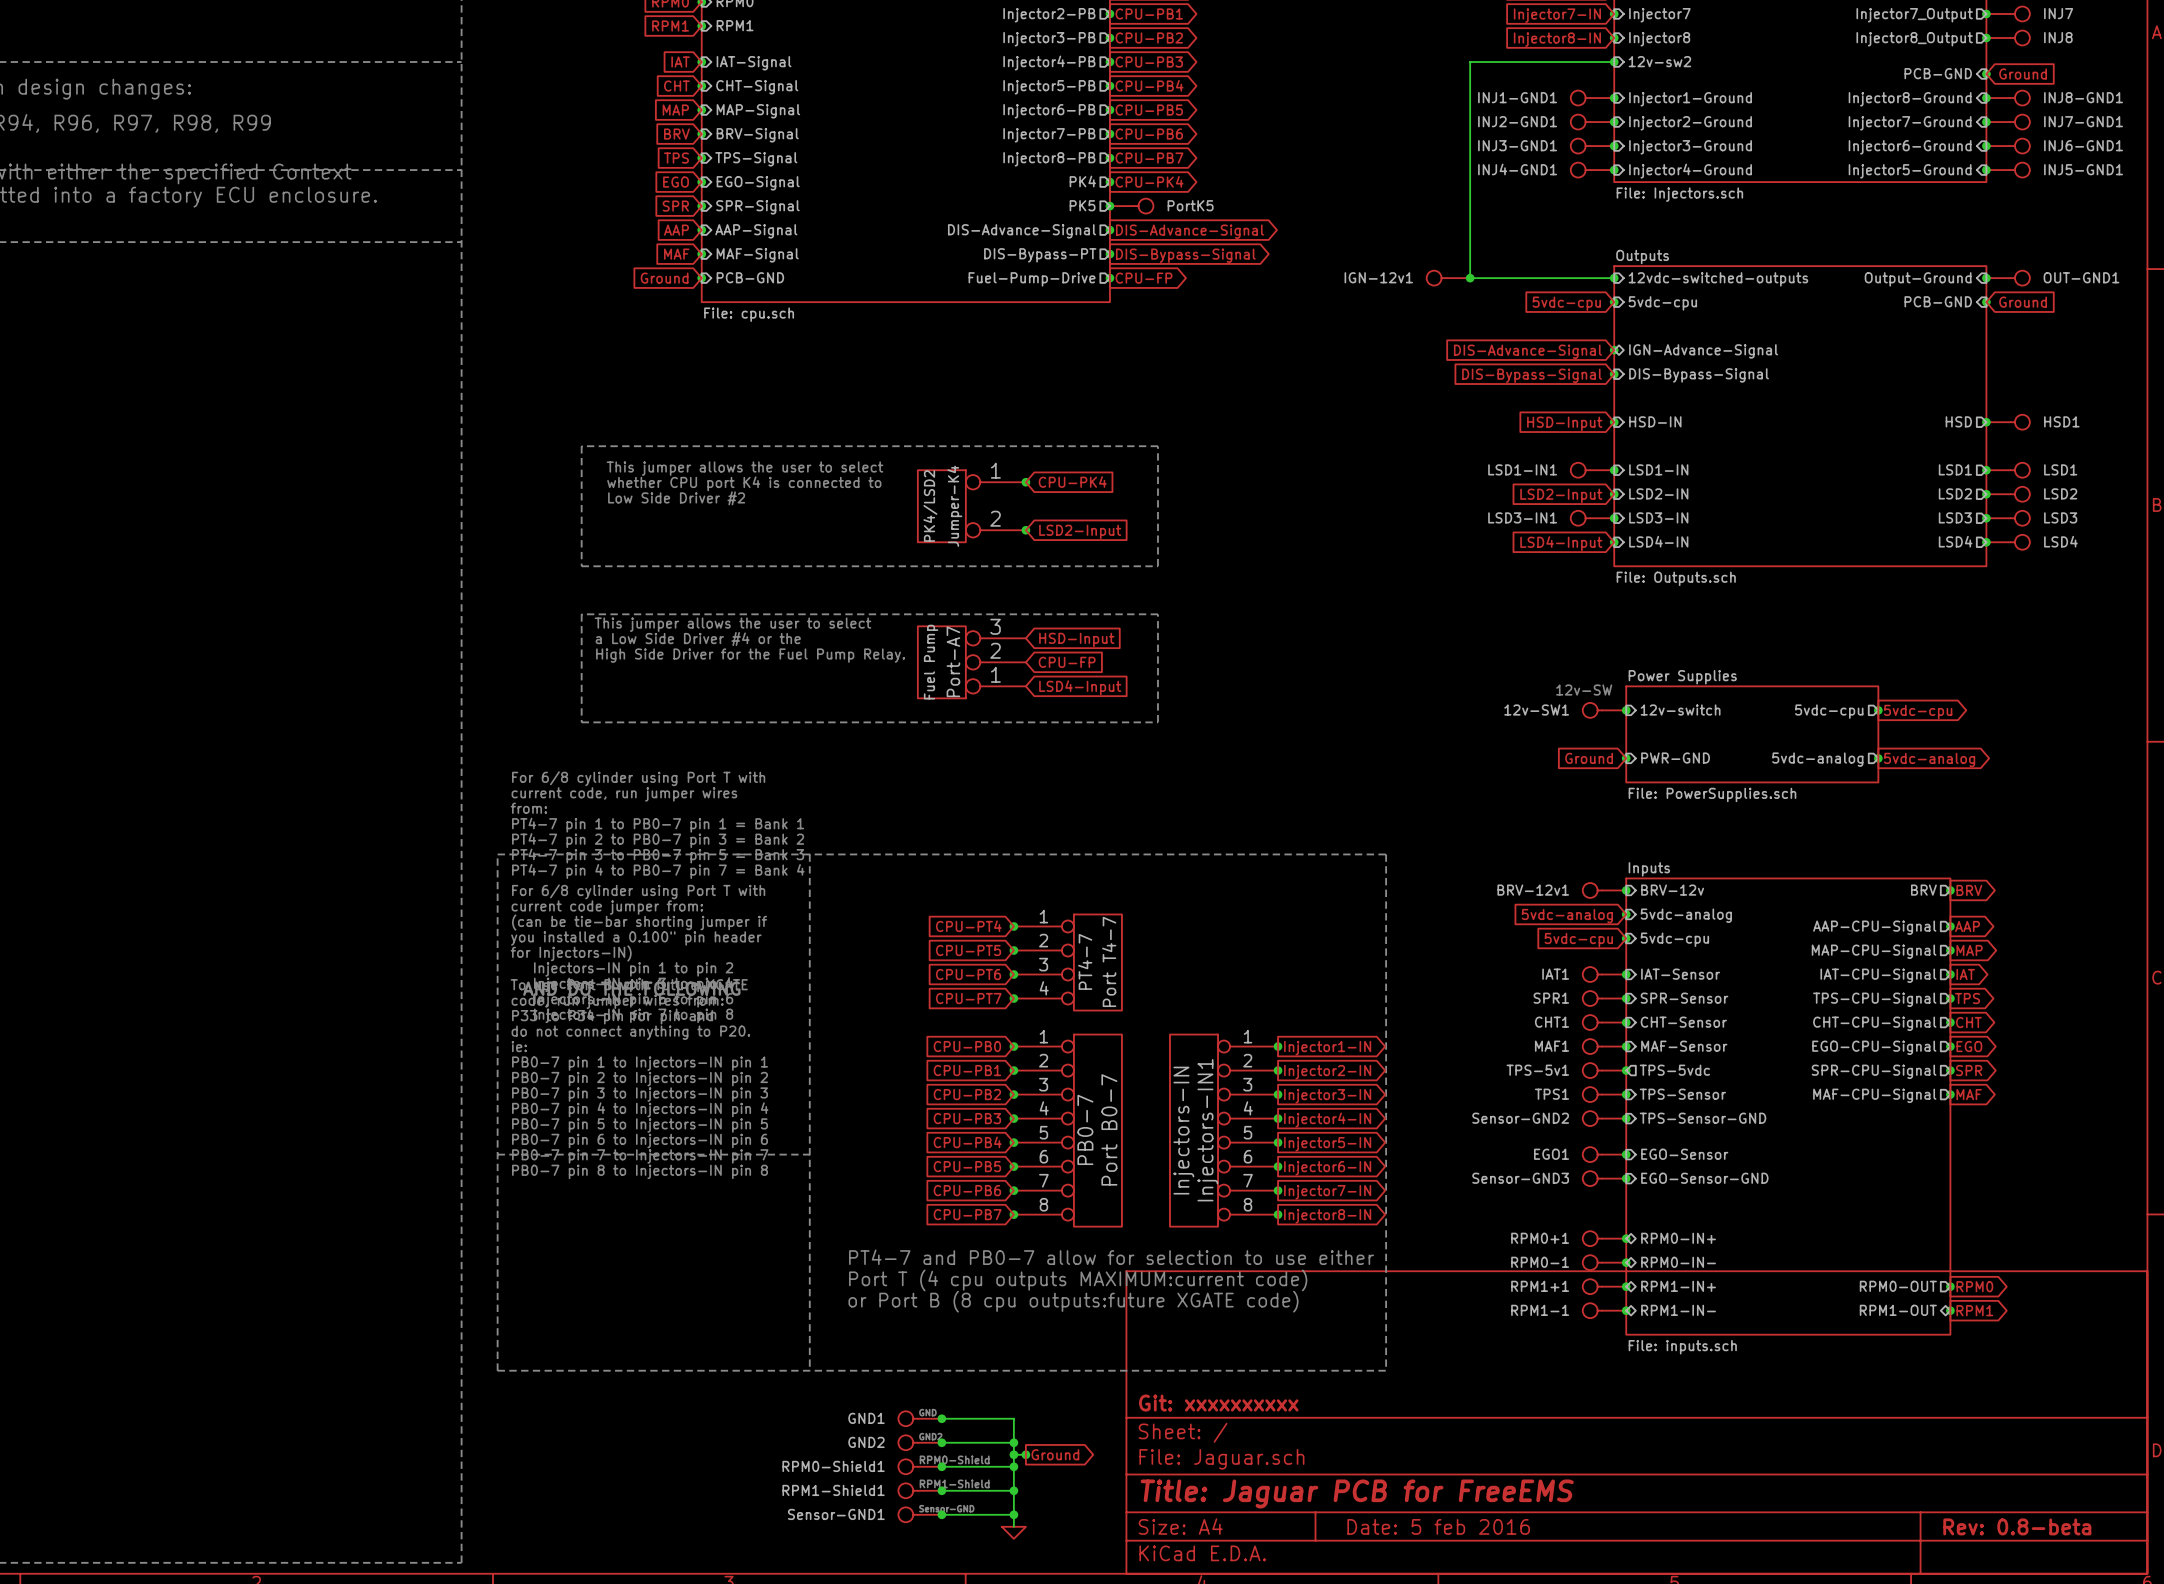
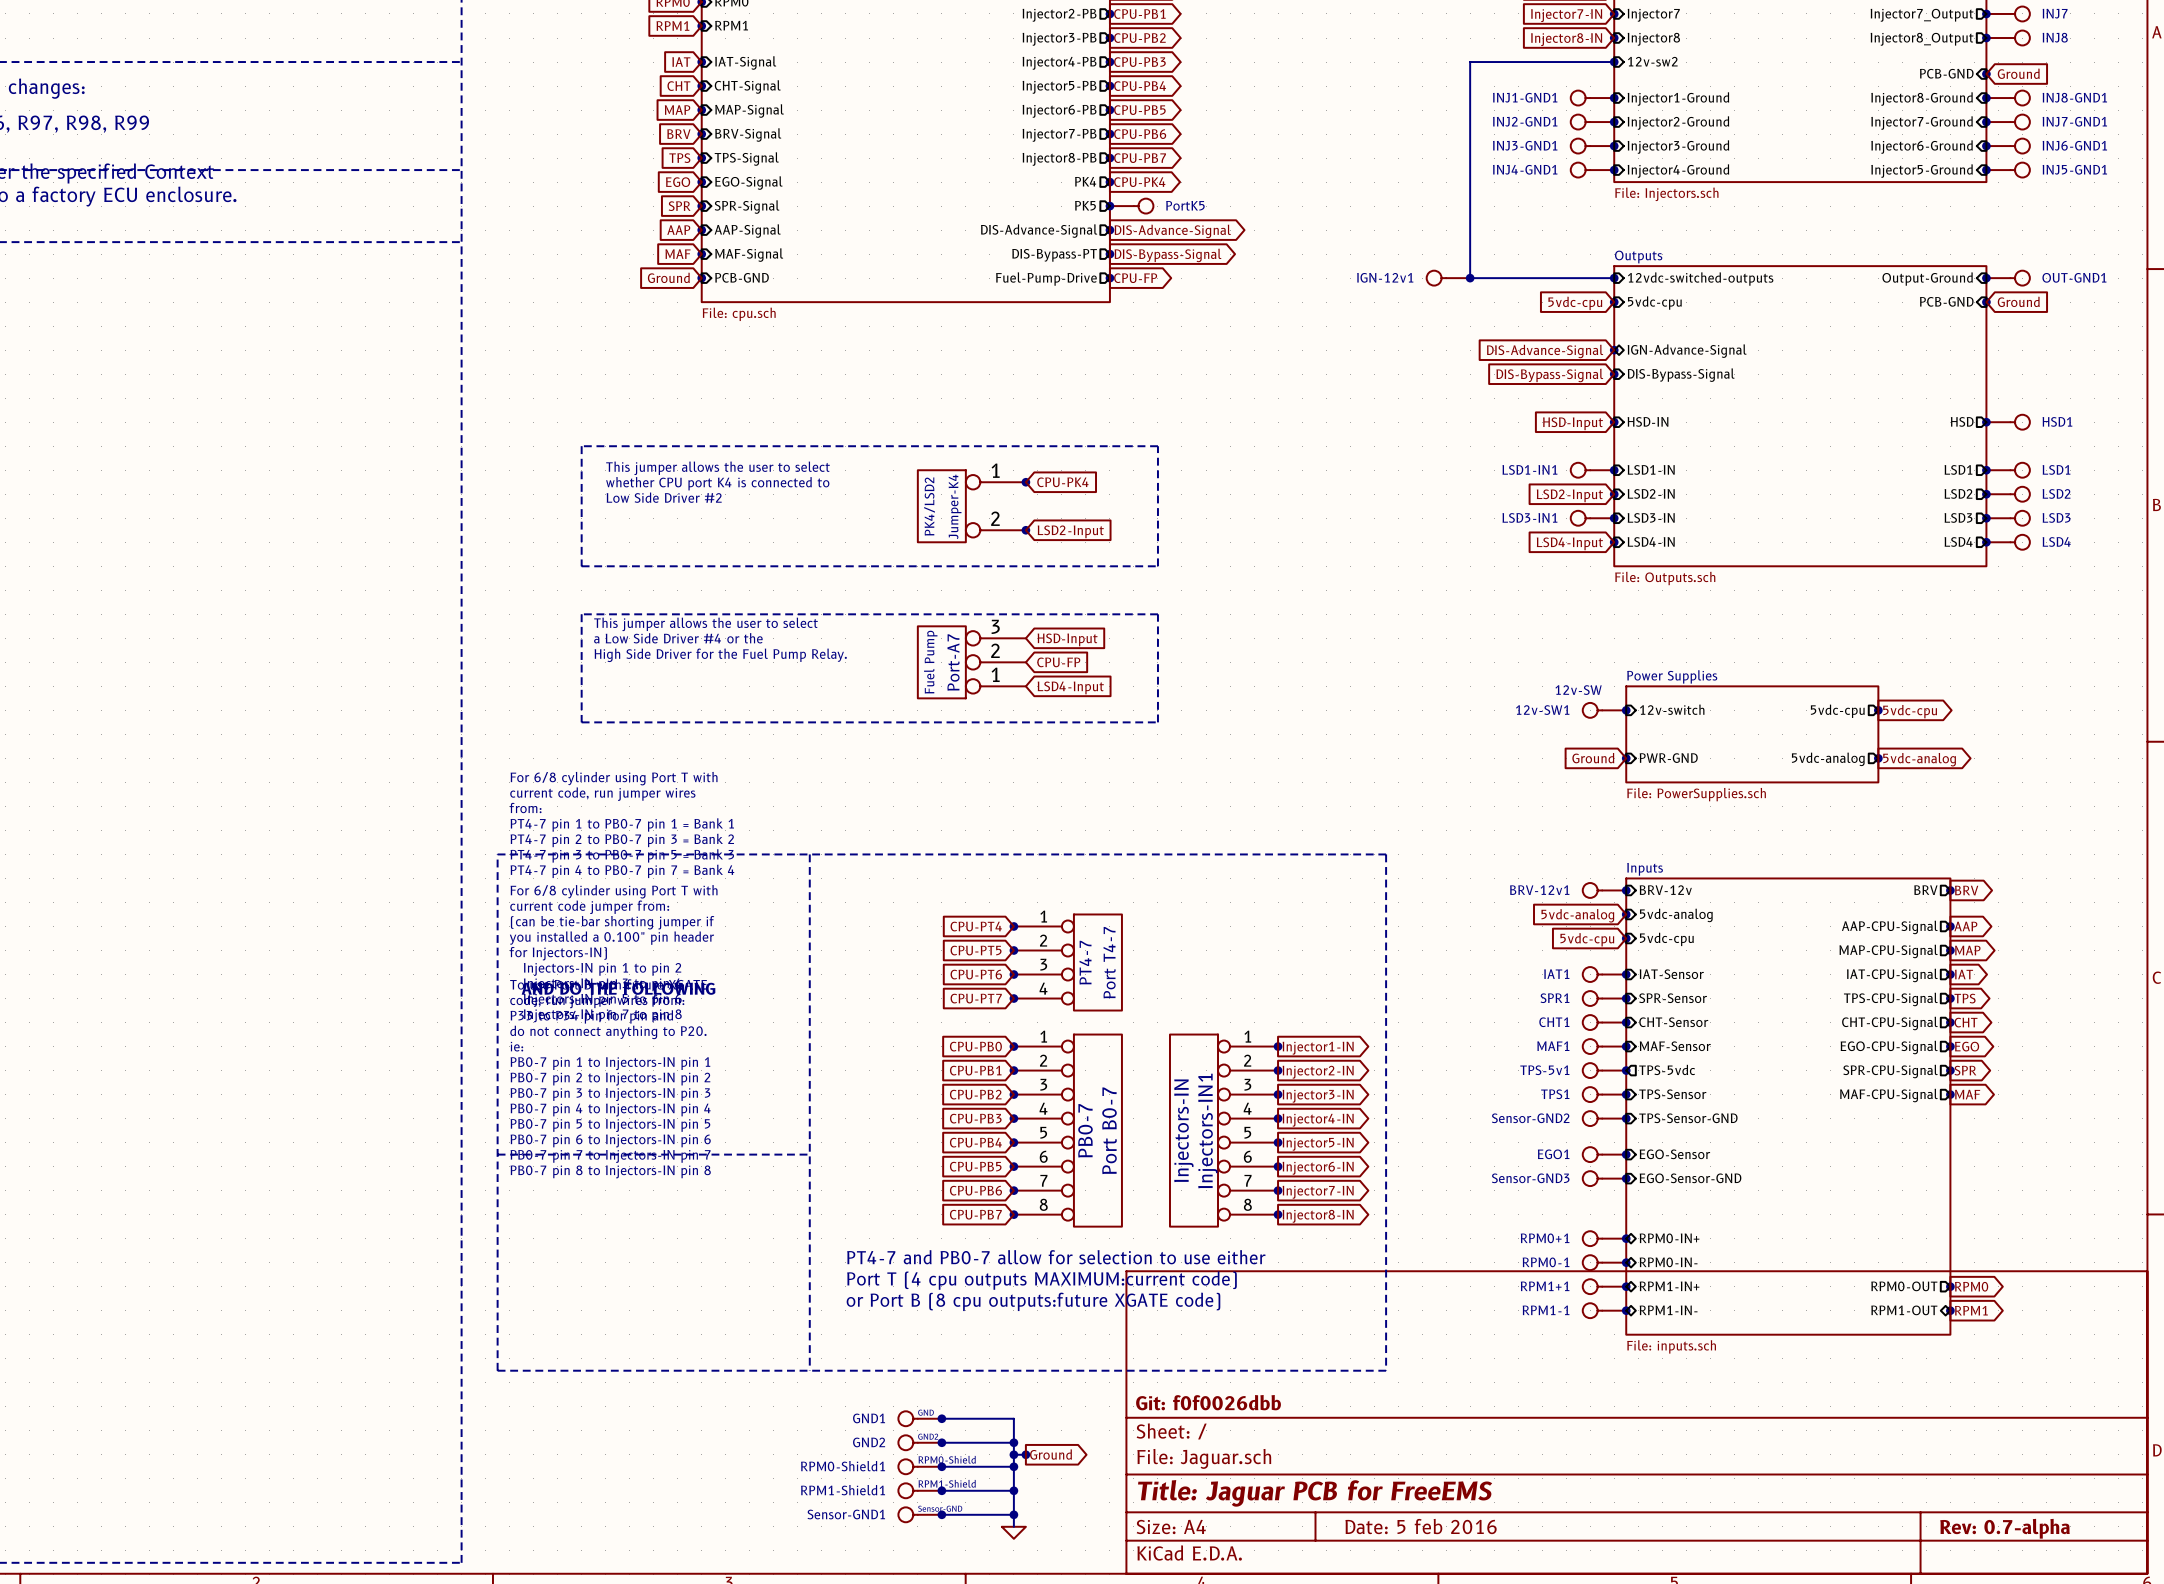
title block: Git: xxxxxxxxxx (1218, 1403) -> Git: f0f0026dbb (1208, 1402)
title block: Rev: 0.8-beta (2017, 1526) -> Rev: 0.7-alpha (2004, 1528)

